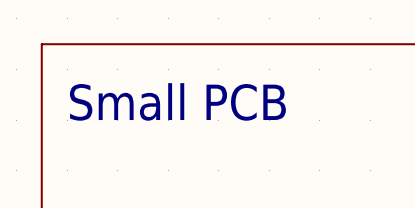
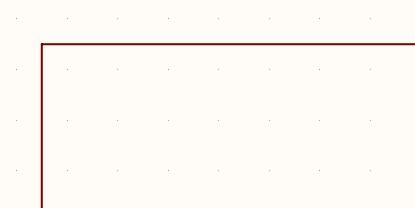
text: Small PCB (177, 101) -> none

